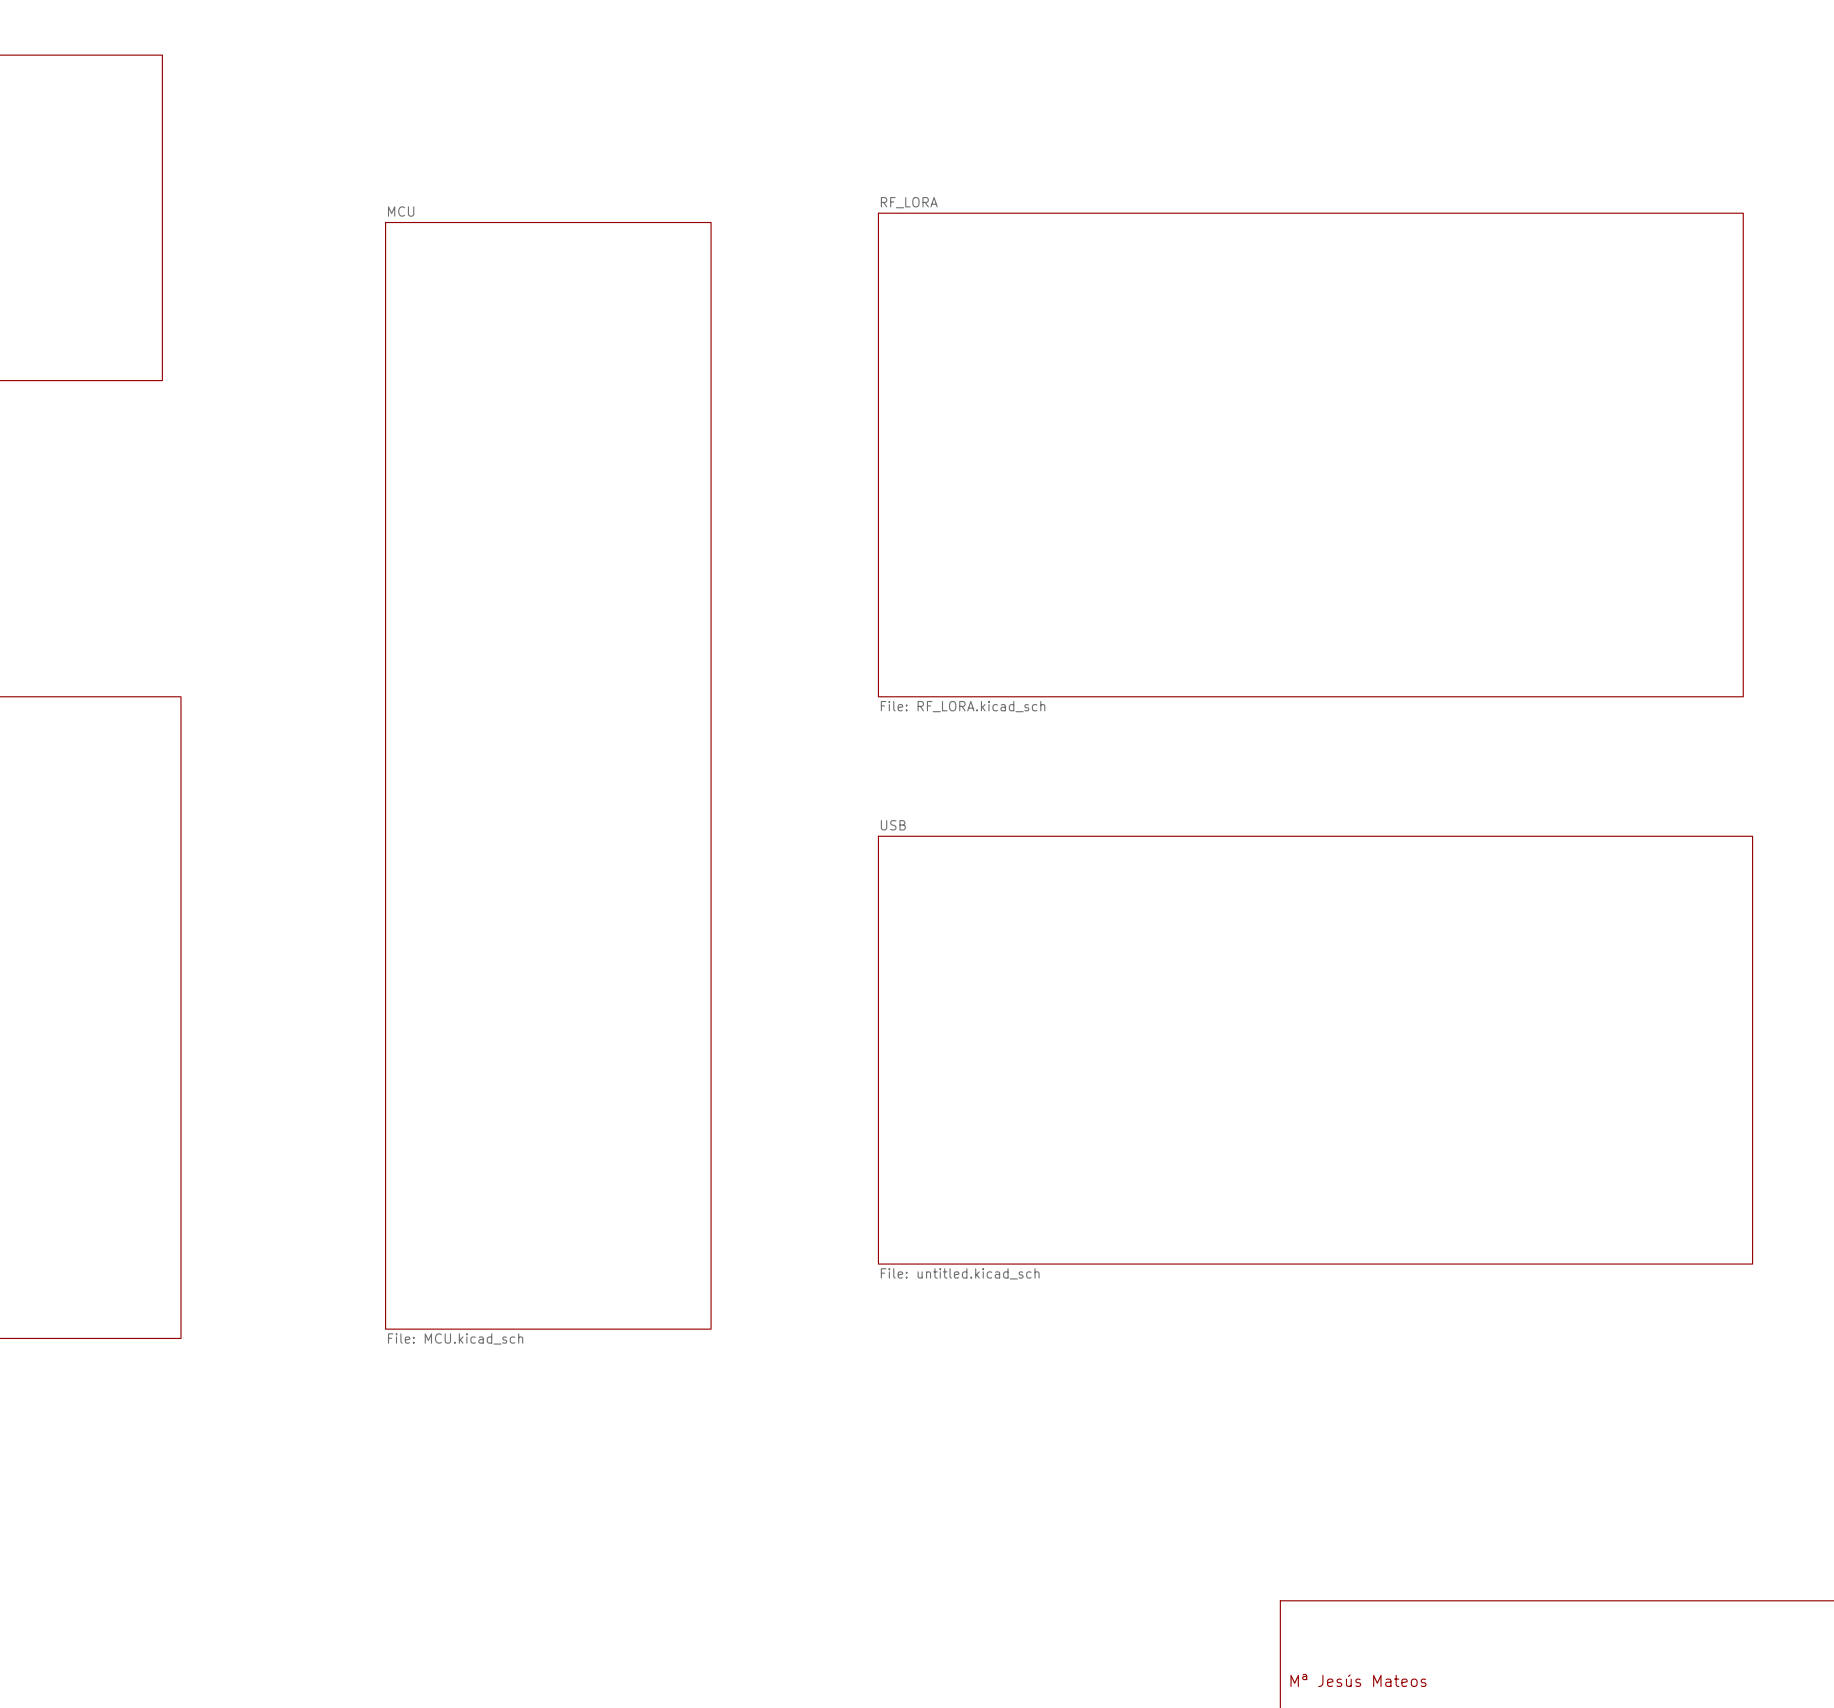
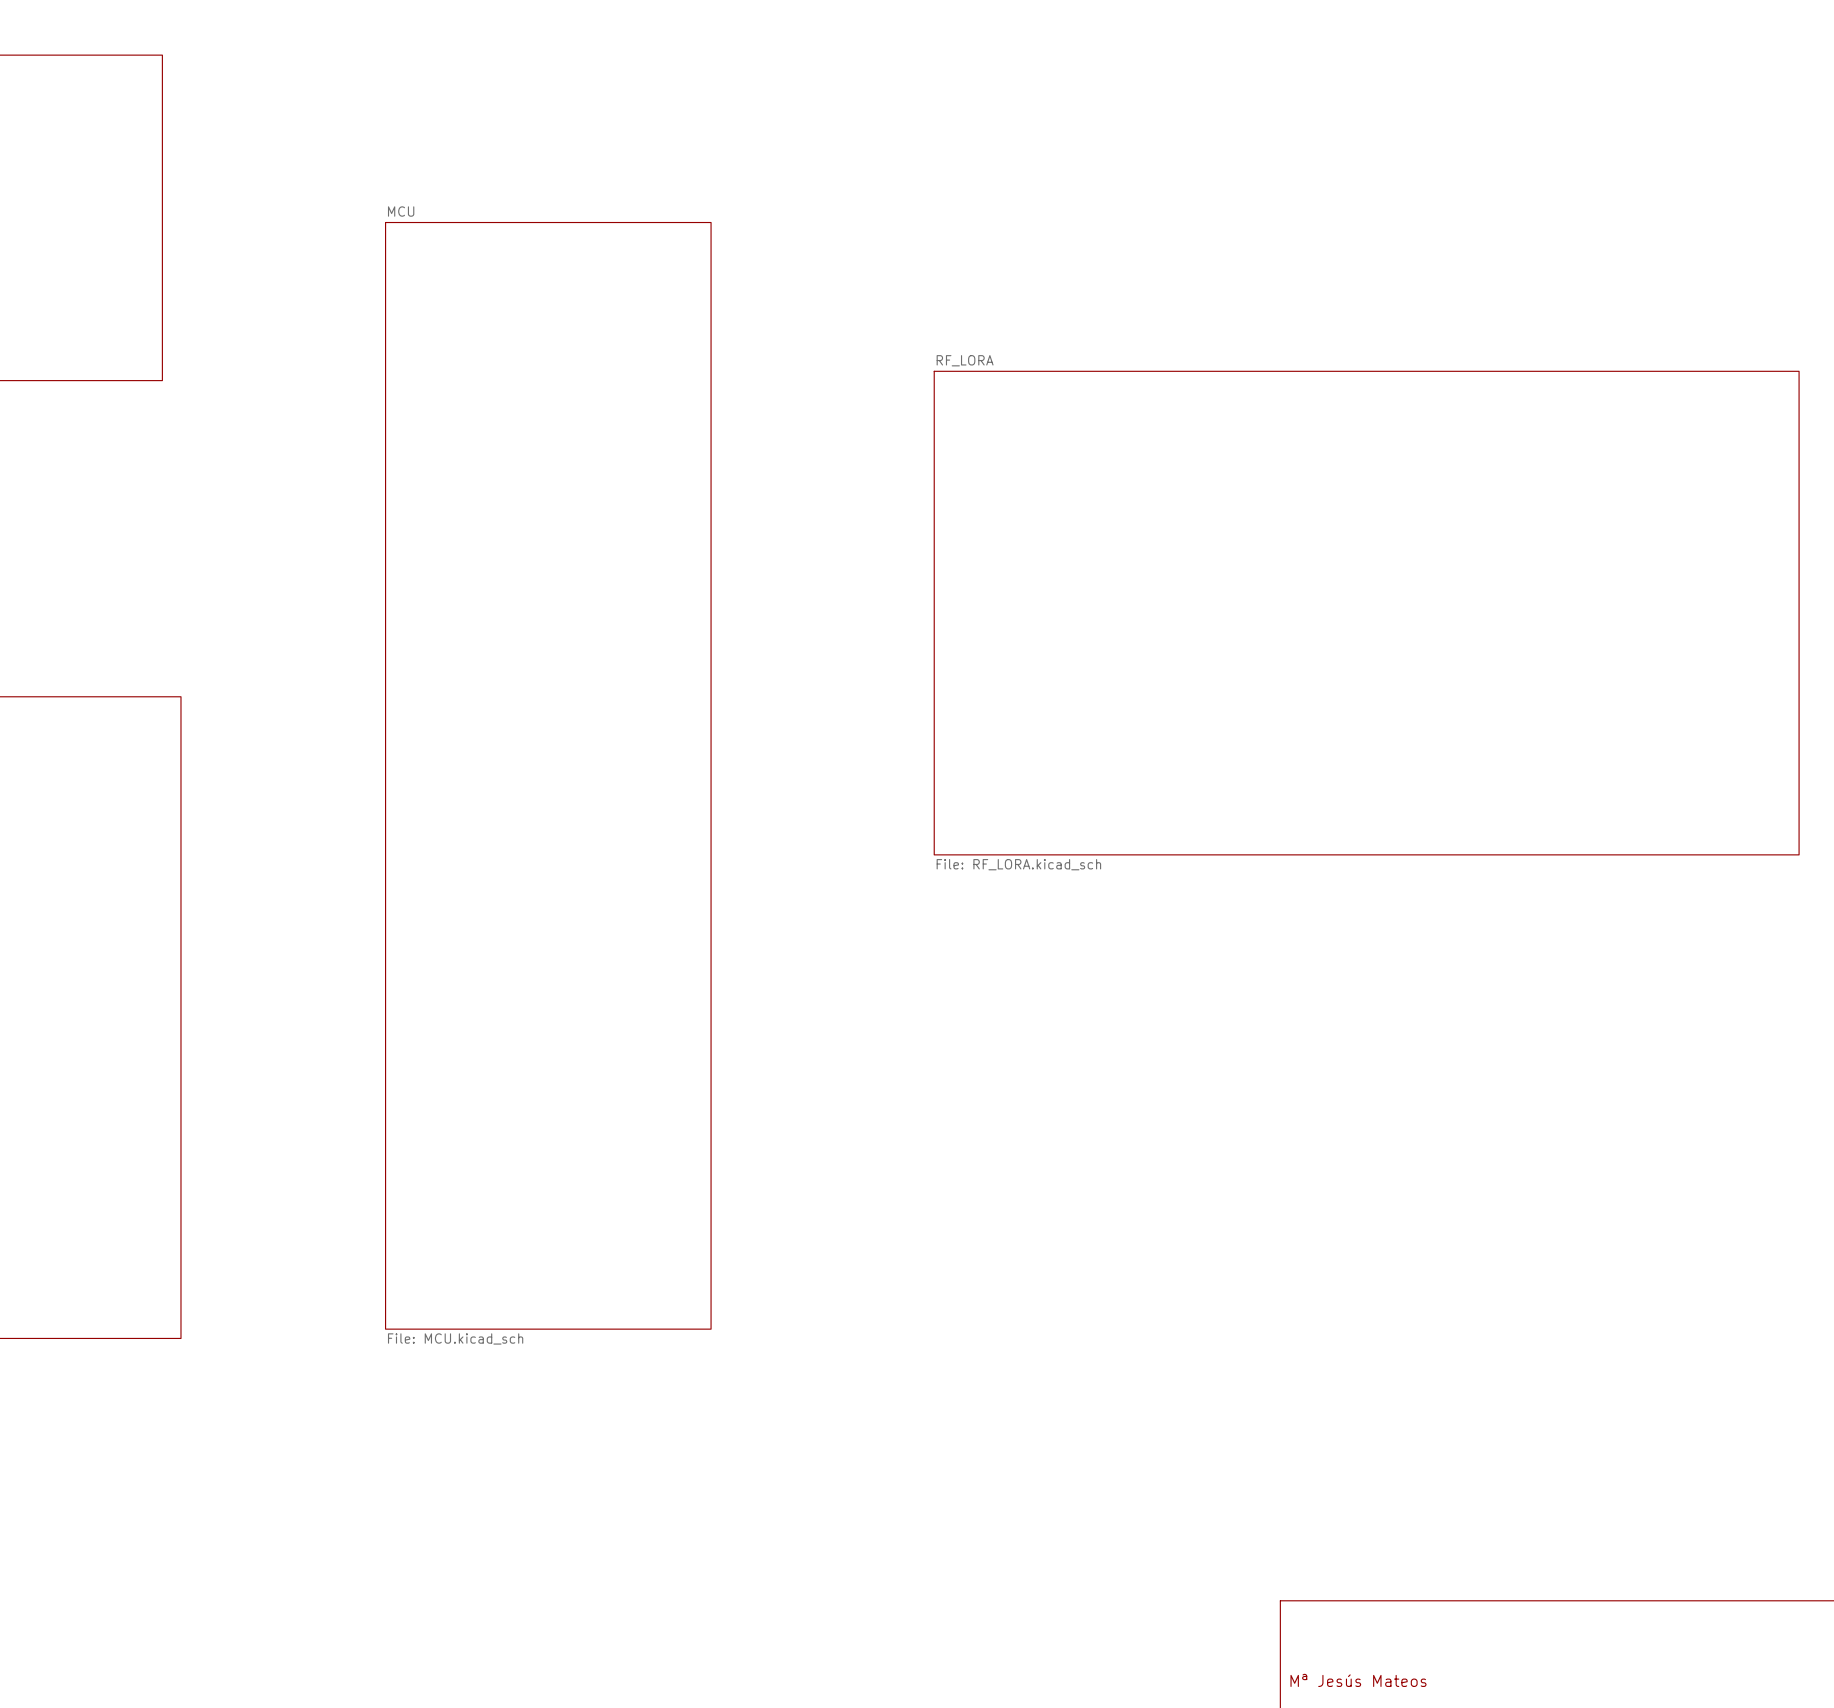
sheet RF_LORA position: (1310, 455) -> (1366, 613)
sheet USB: File: untitled.kicad_sch (1315, 1050) -> none

